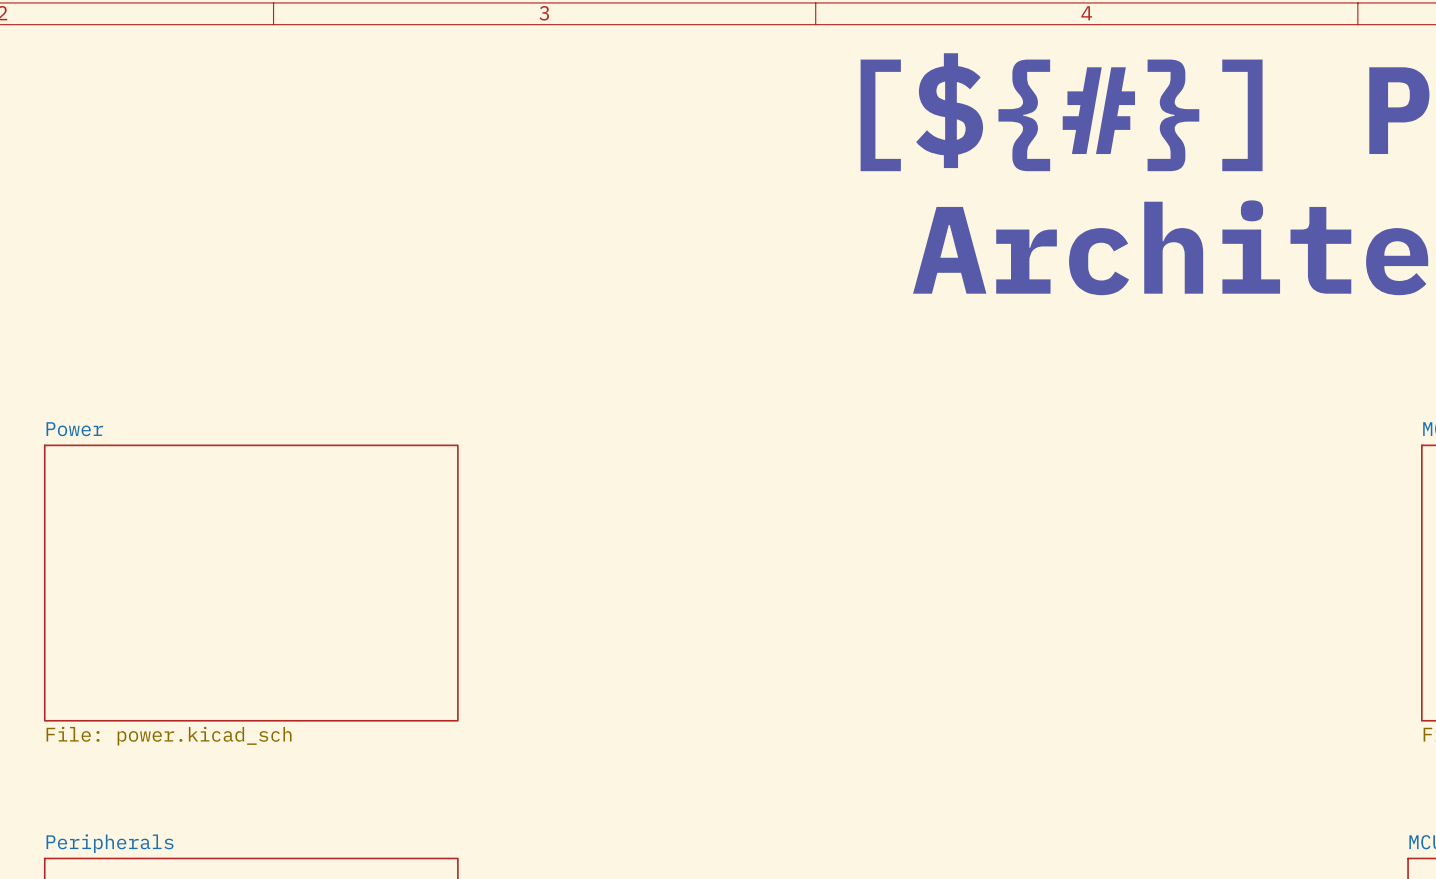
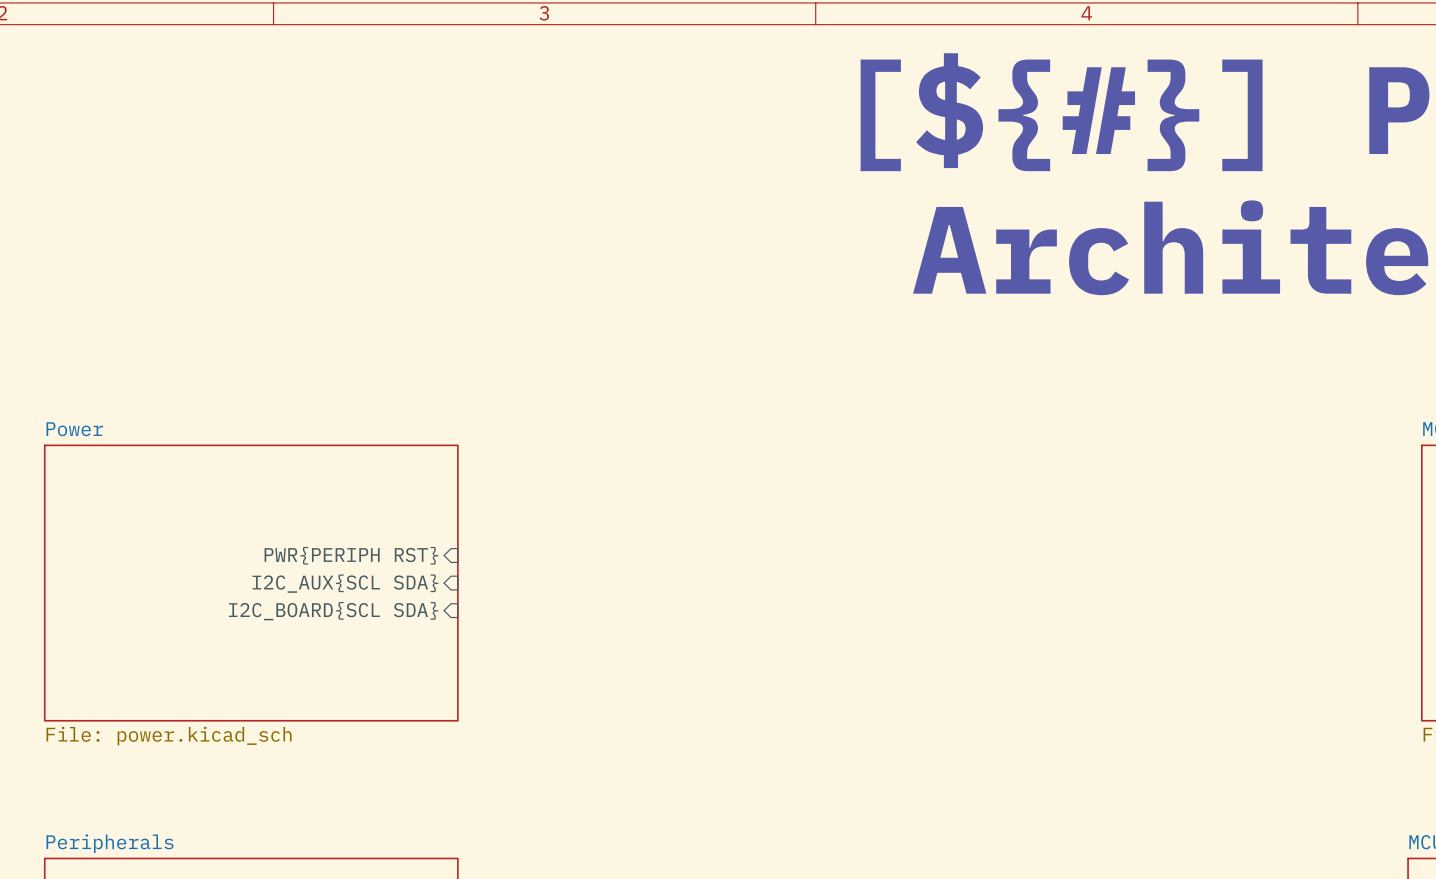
sheet pin: none -> PWR{PERIPH RST} (351, 555)
sheet pin: none -> I2C_AUX{SCL SDA} (345, 583)
sheet pin: none -> I2C_BOARD{SCL SDA} (333, 611)

